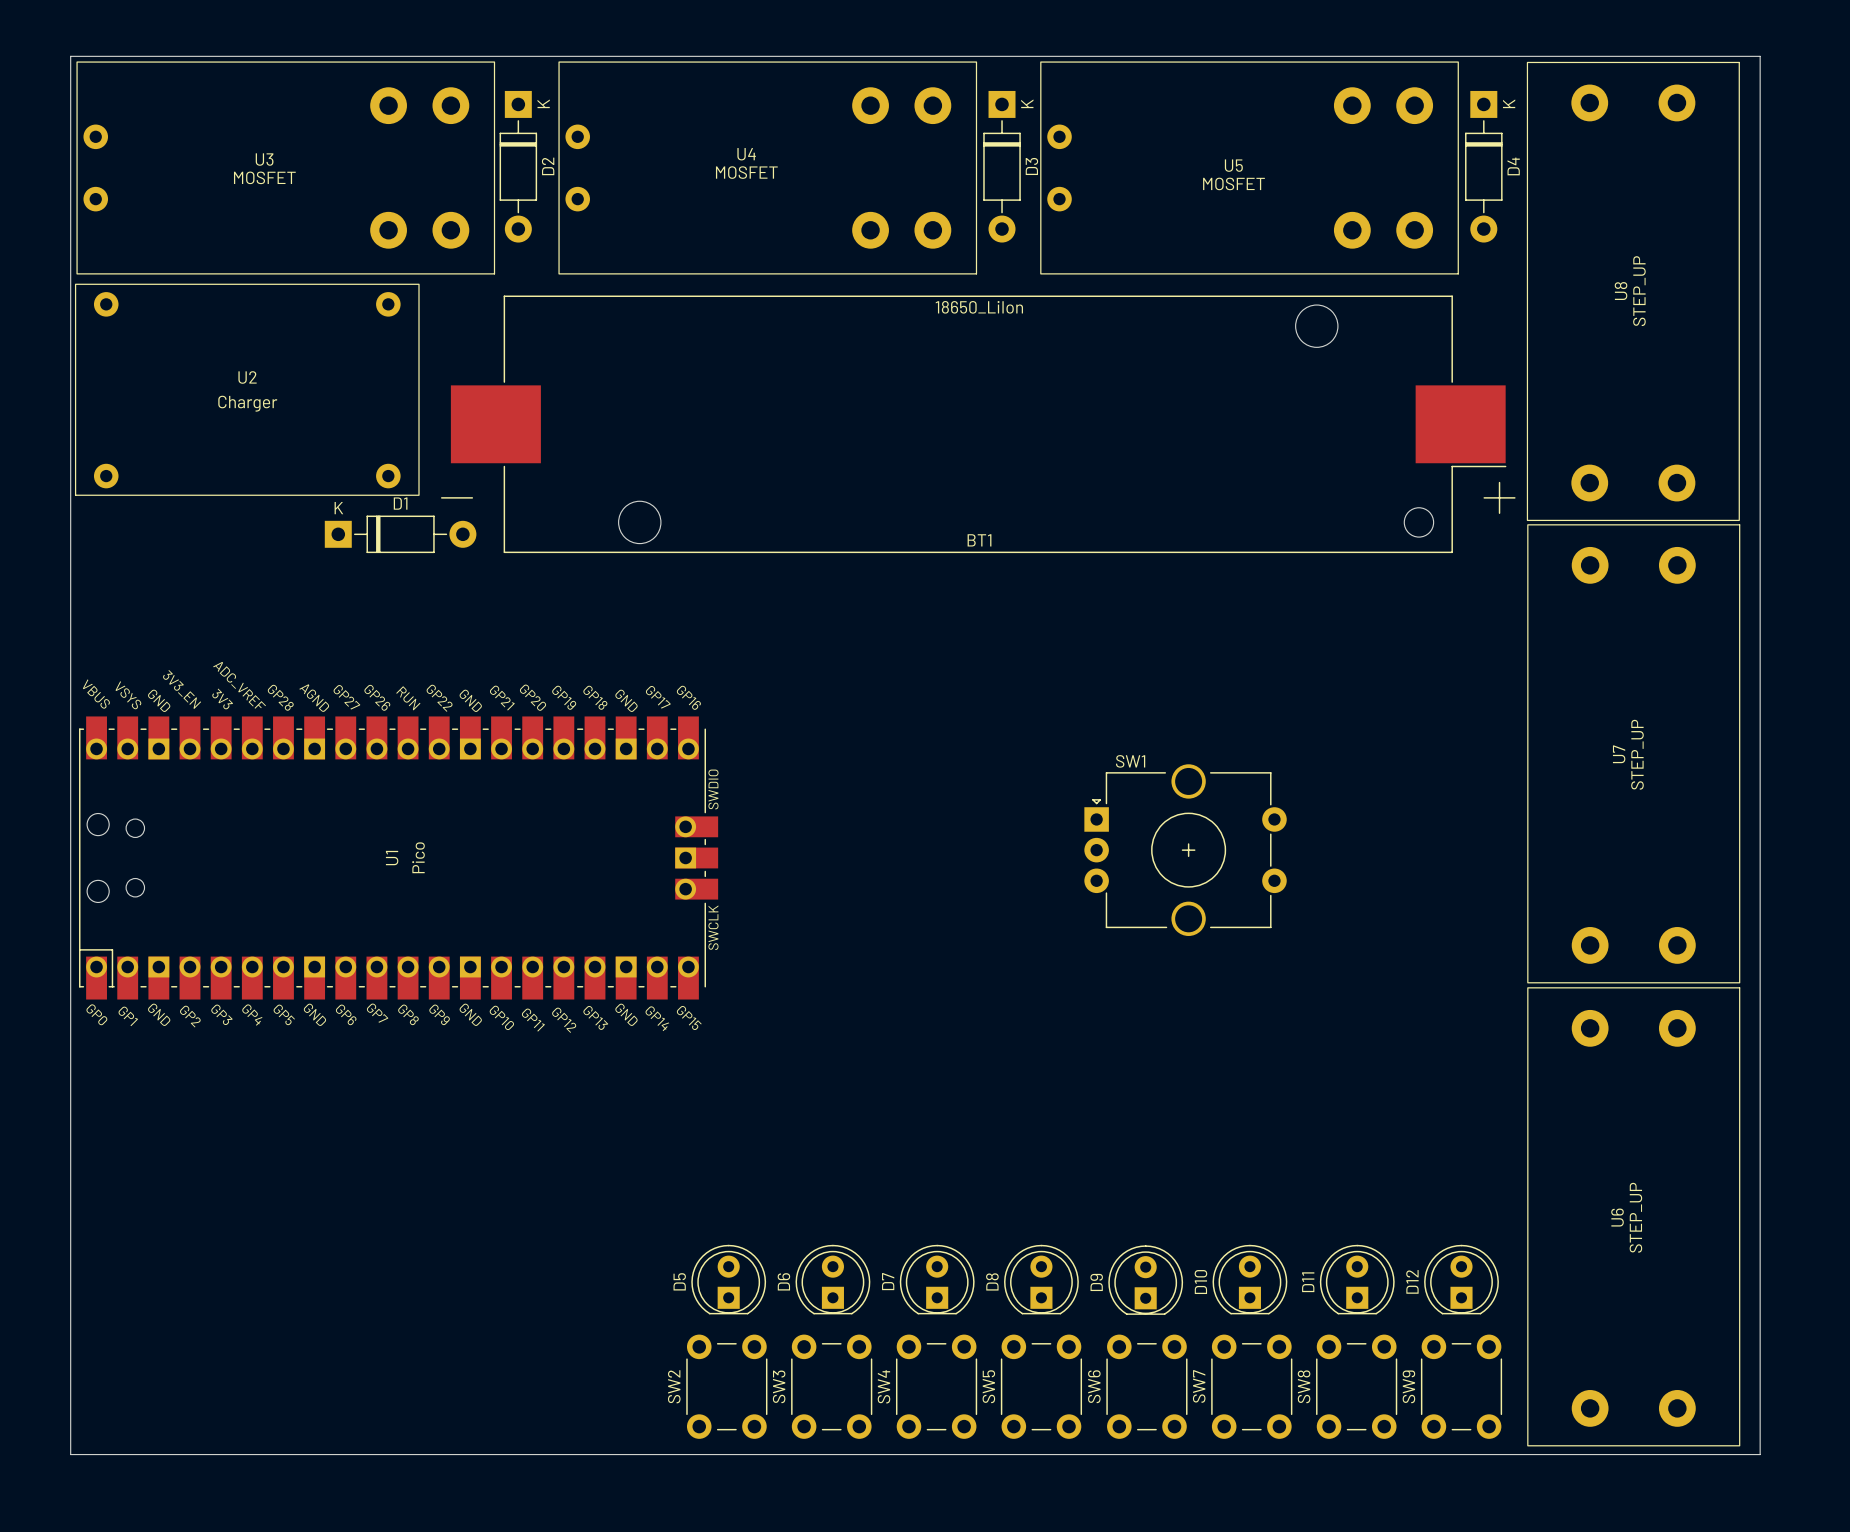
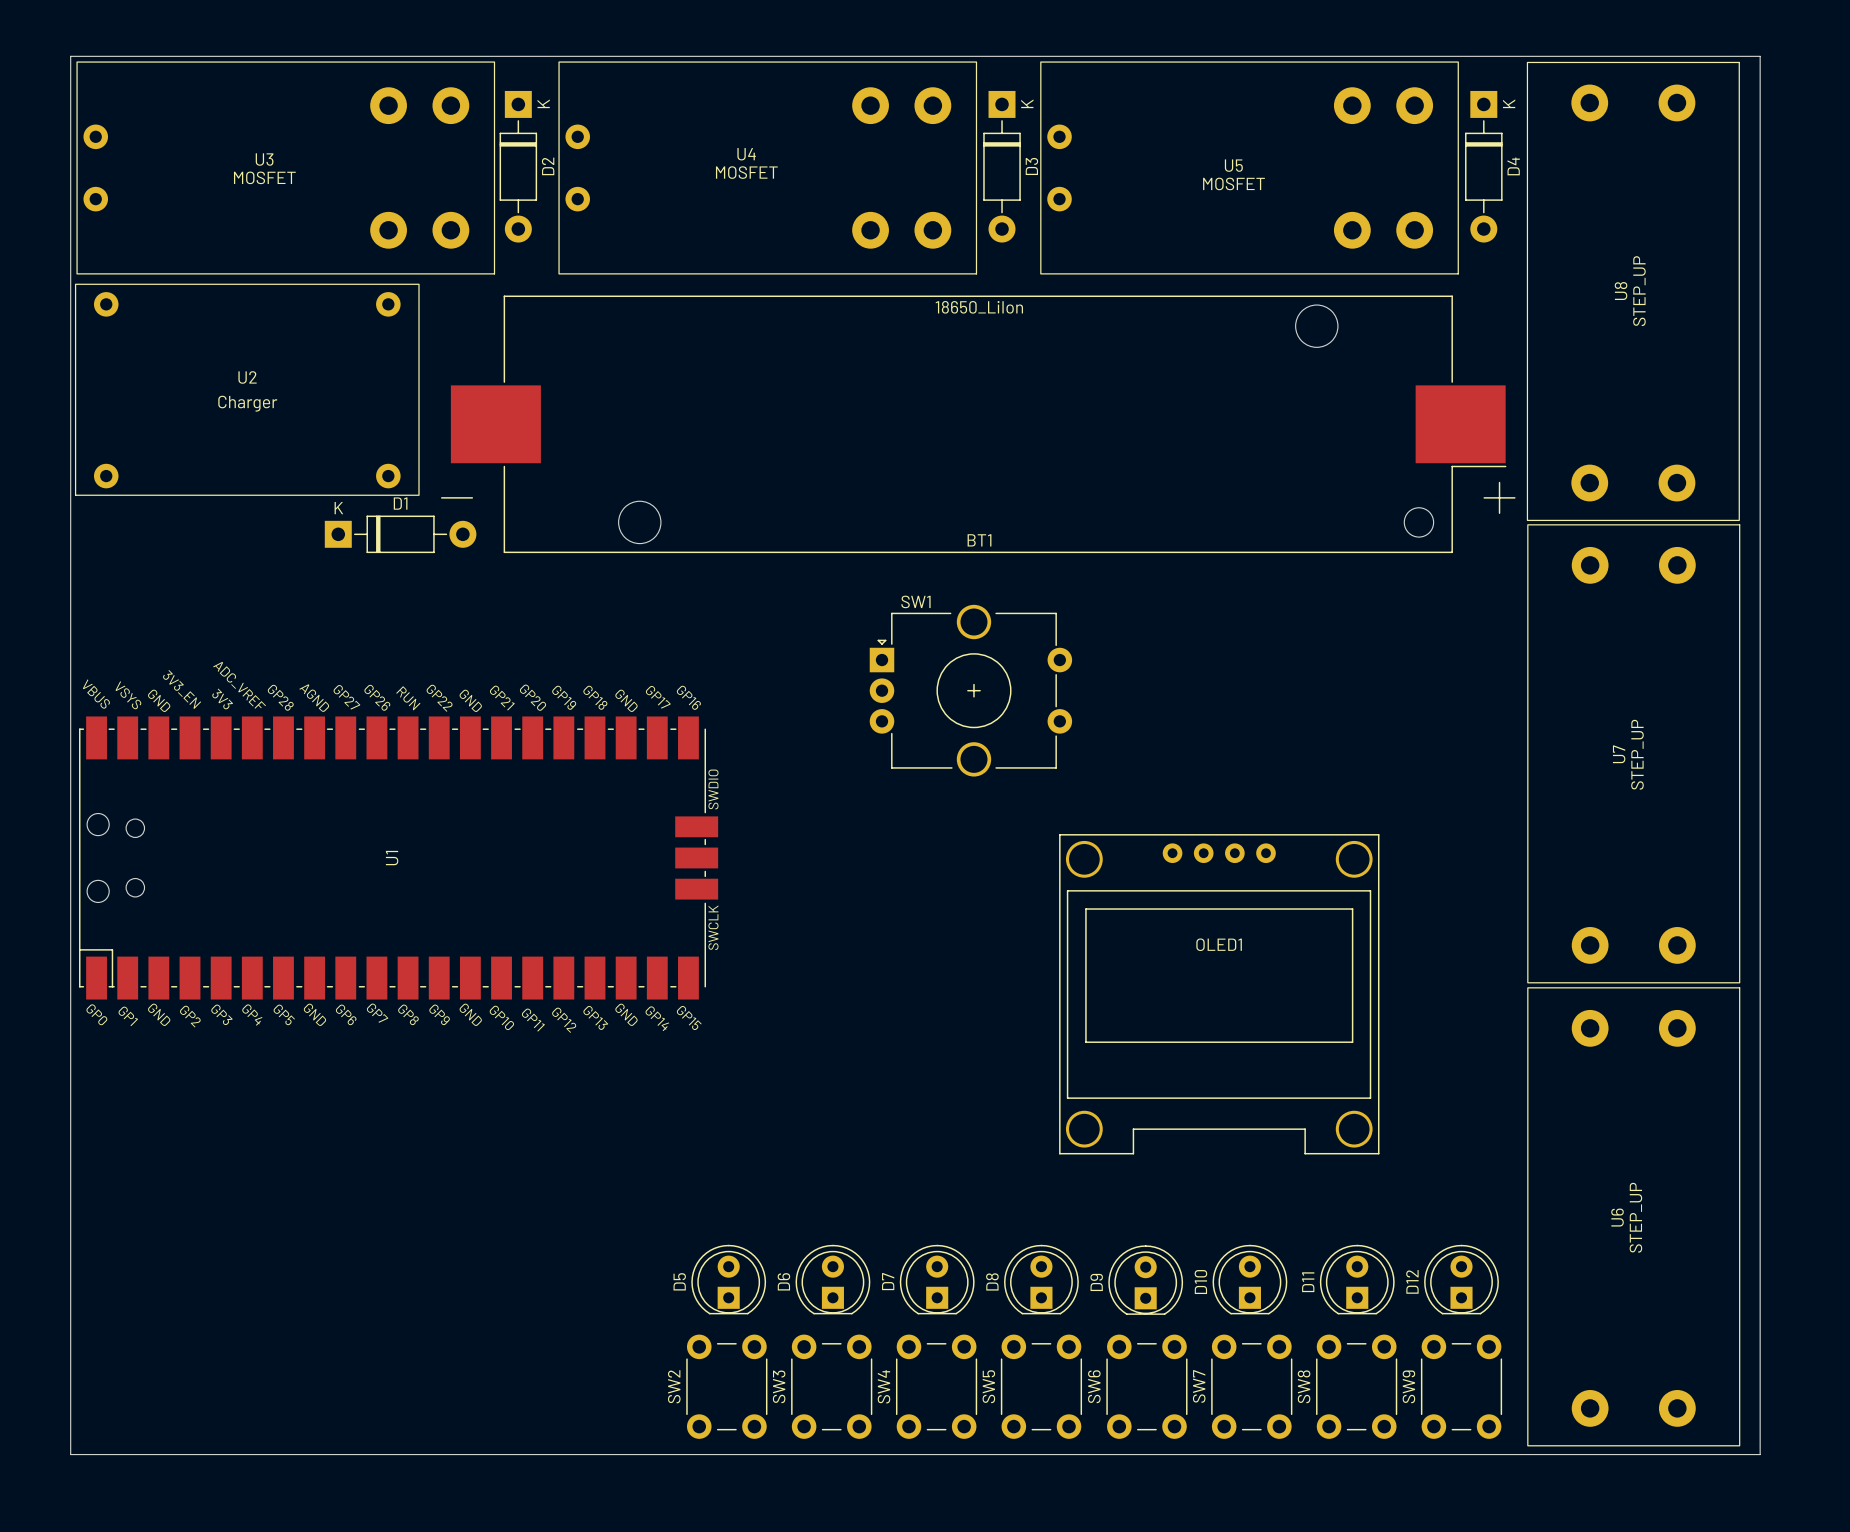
U1 footprint: [79, 716, 719, 1000] -> [79, 716, 719, 1000]
SW1 position: (1185, 850) -> (970, 690)
U1 value: Pico (418, 857) -> none
OLED1: none -> (1219, 994)

